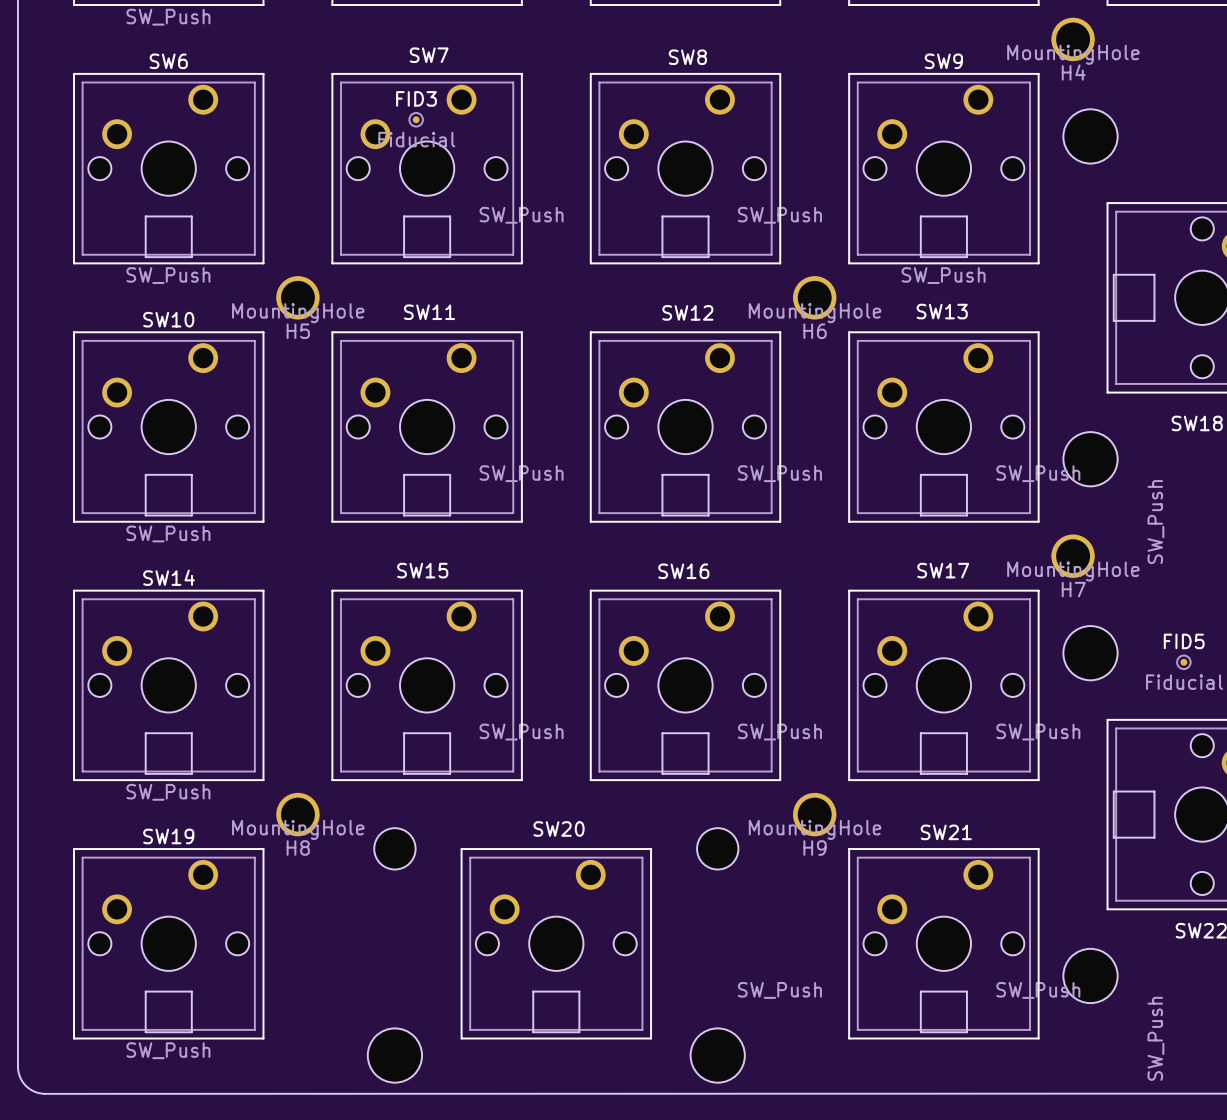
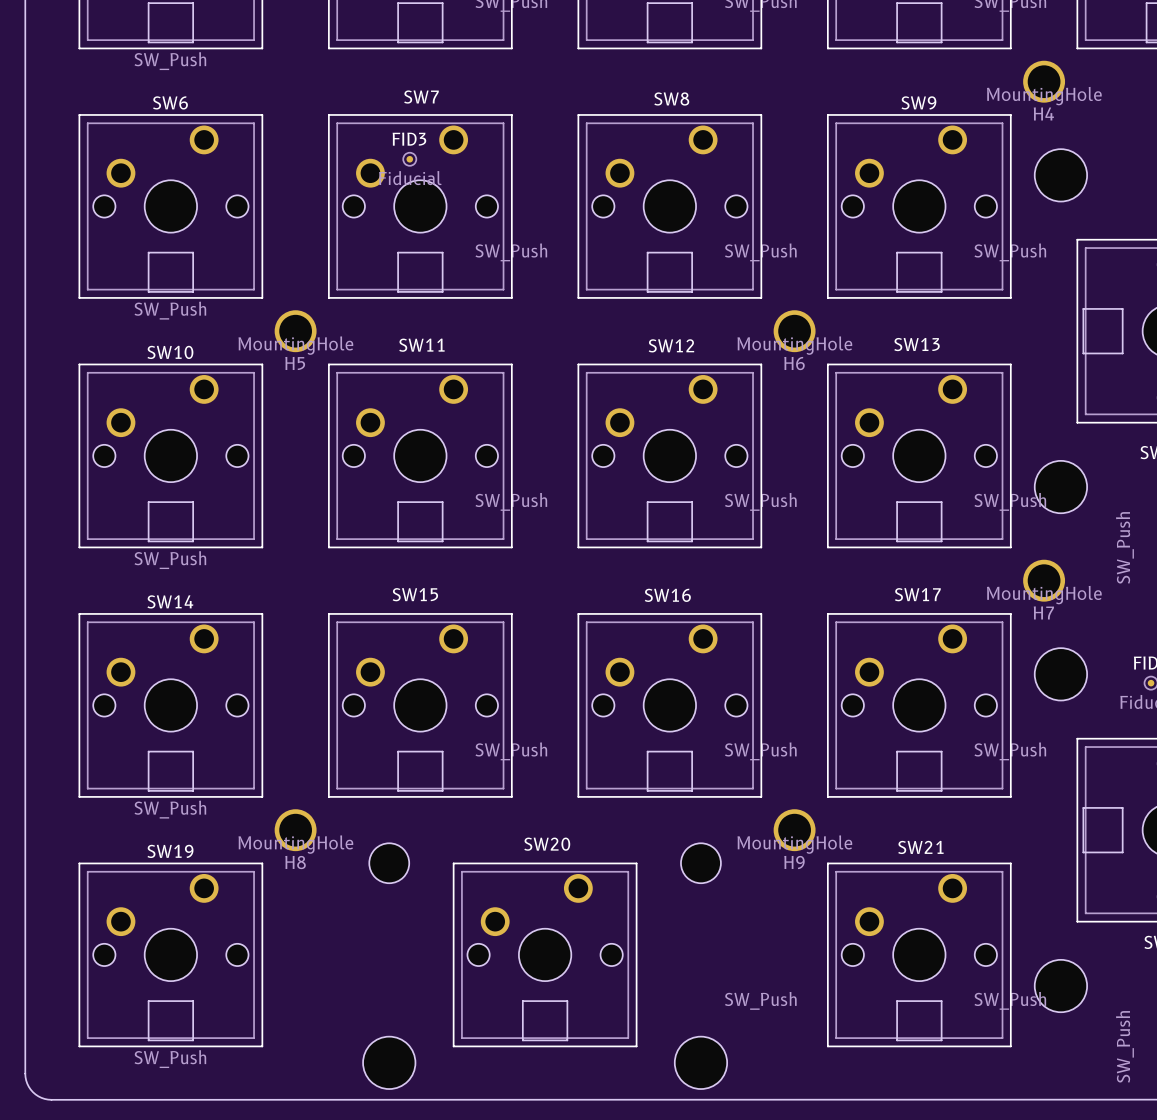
SW9 value position: SW_Push (943, 275) -> SW_Push (1010, 252)

